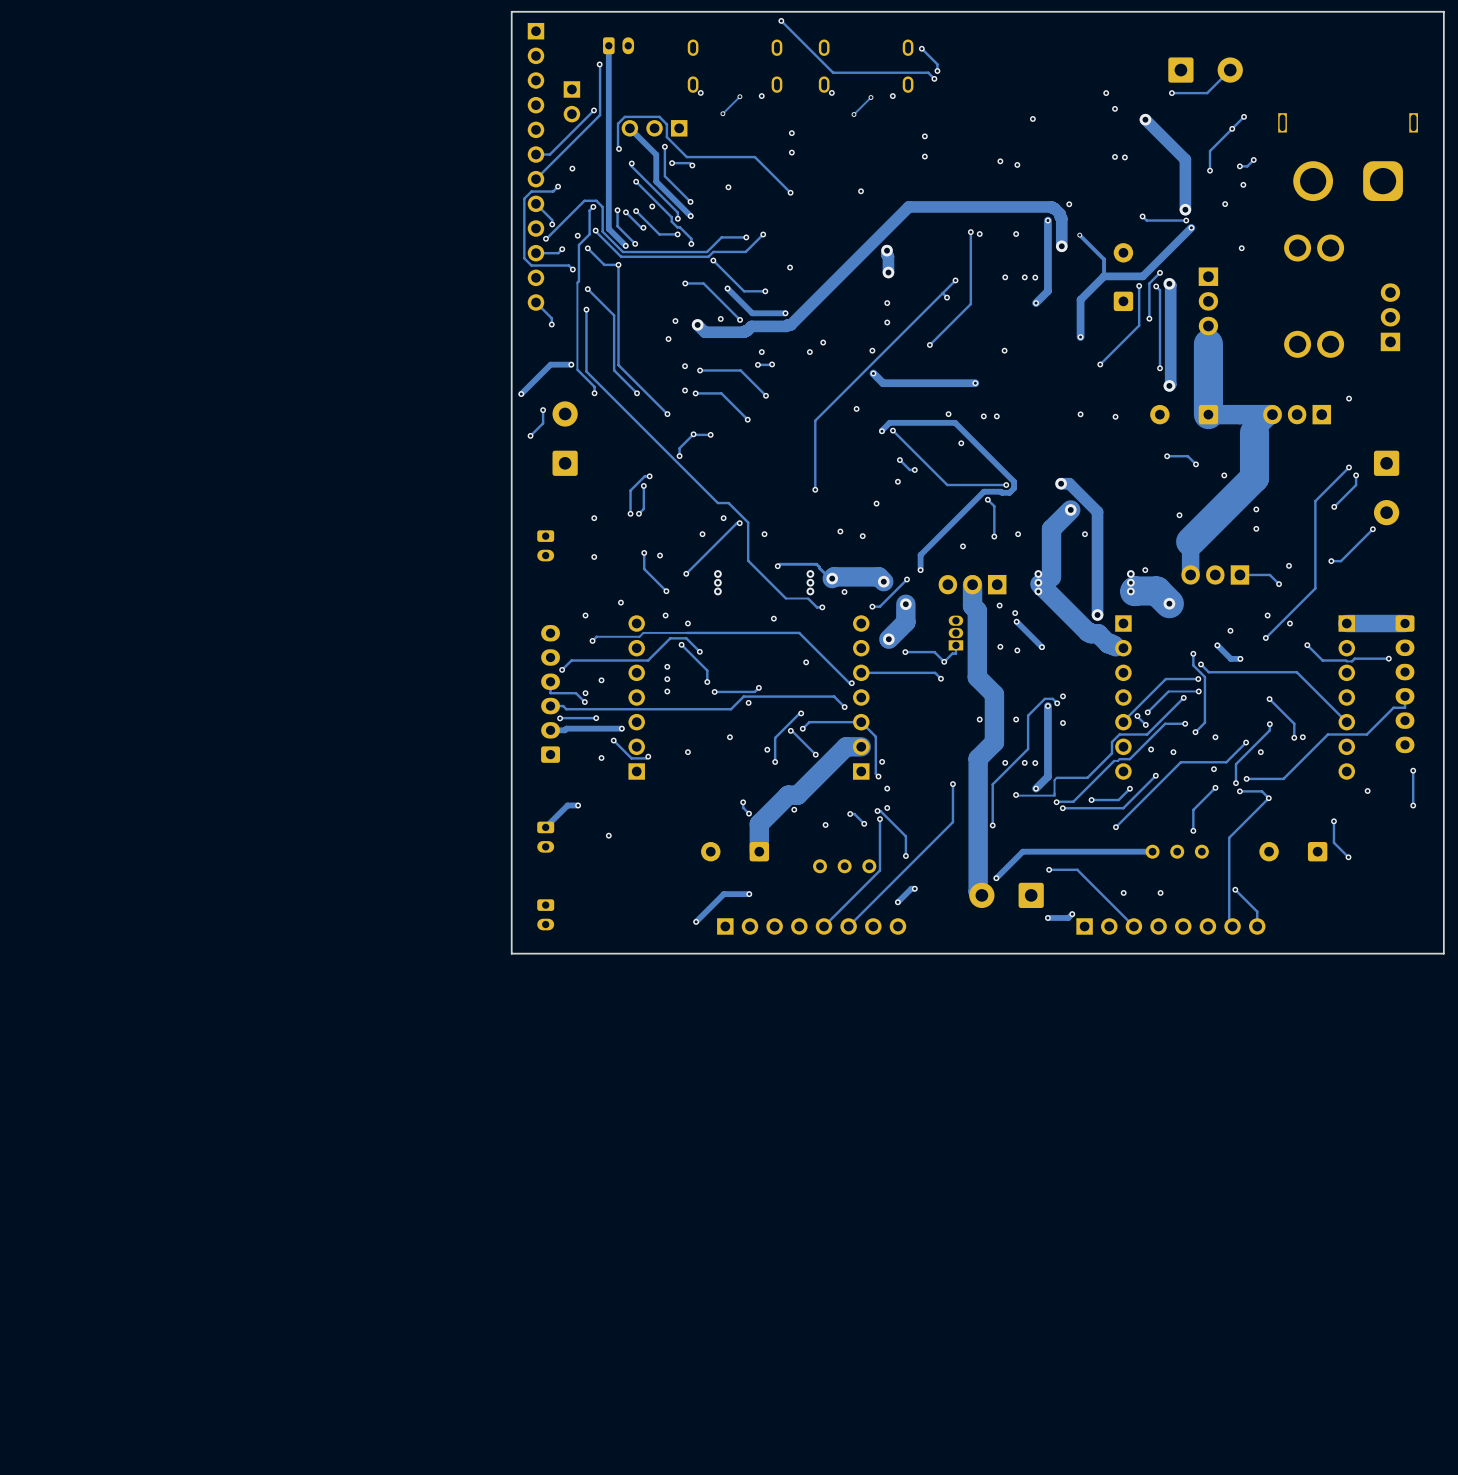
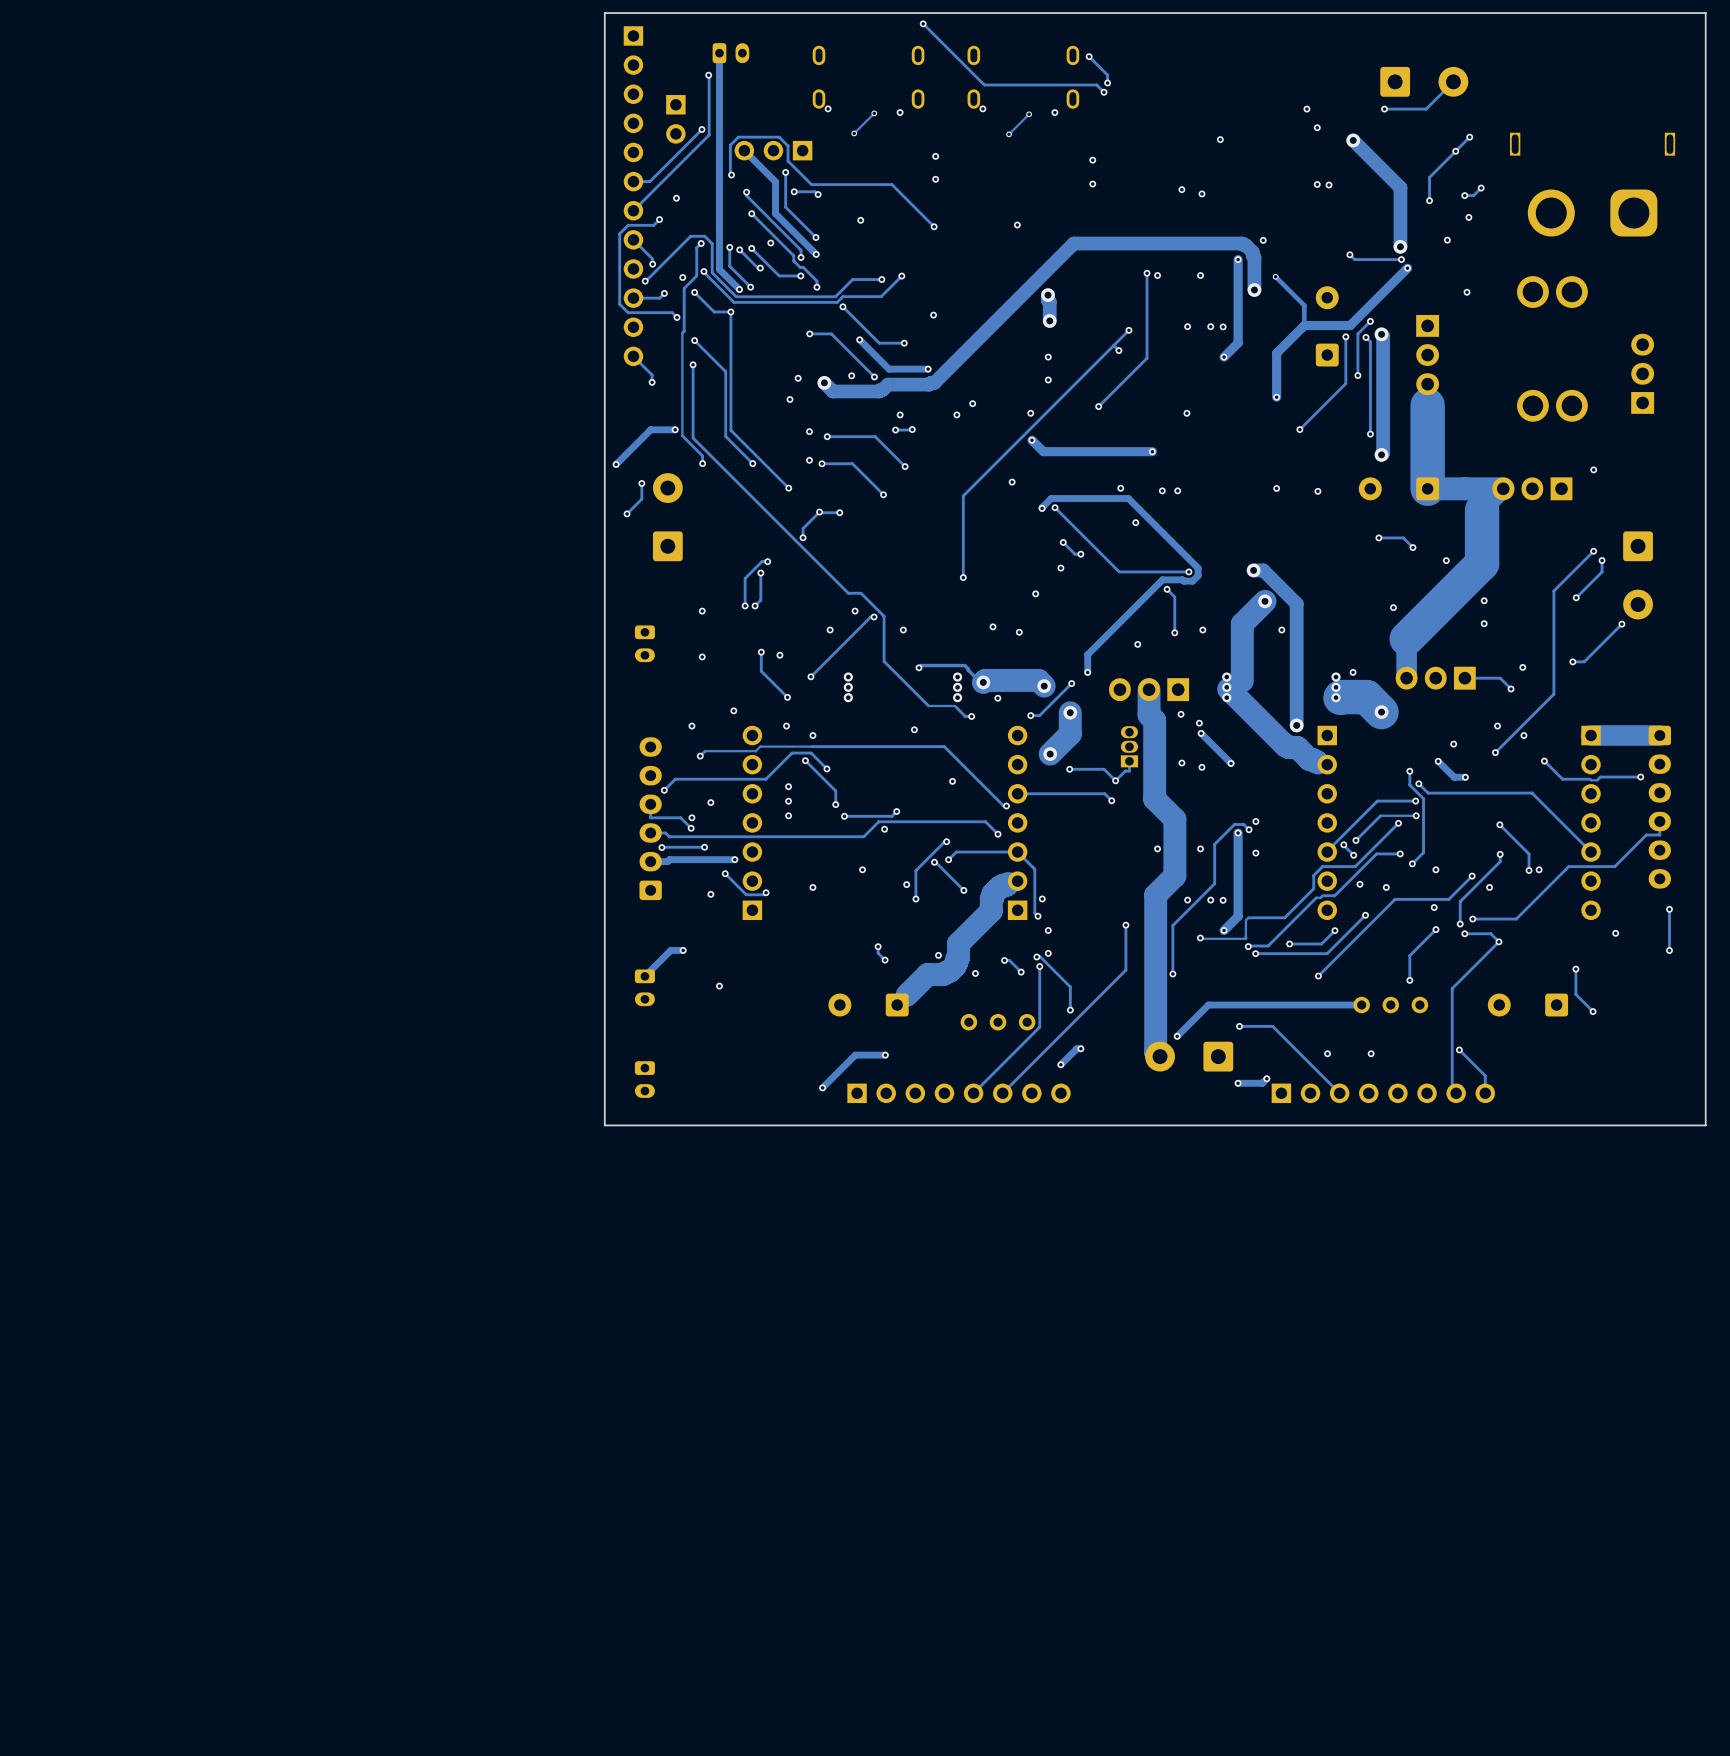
track: (861, 746) (846, 746) (797, 795) (788, 795) (759, 824) (759, 851) -> none
track: none -> (1008, 883) (999, 886) (992, 893) (991, 910) (958, 943) (958, 957) (955, 966) (943, 974) (927, 974) (906, 995)

